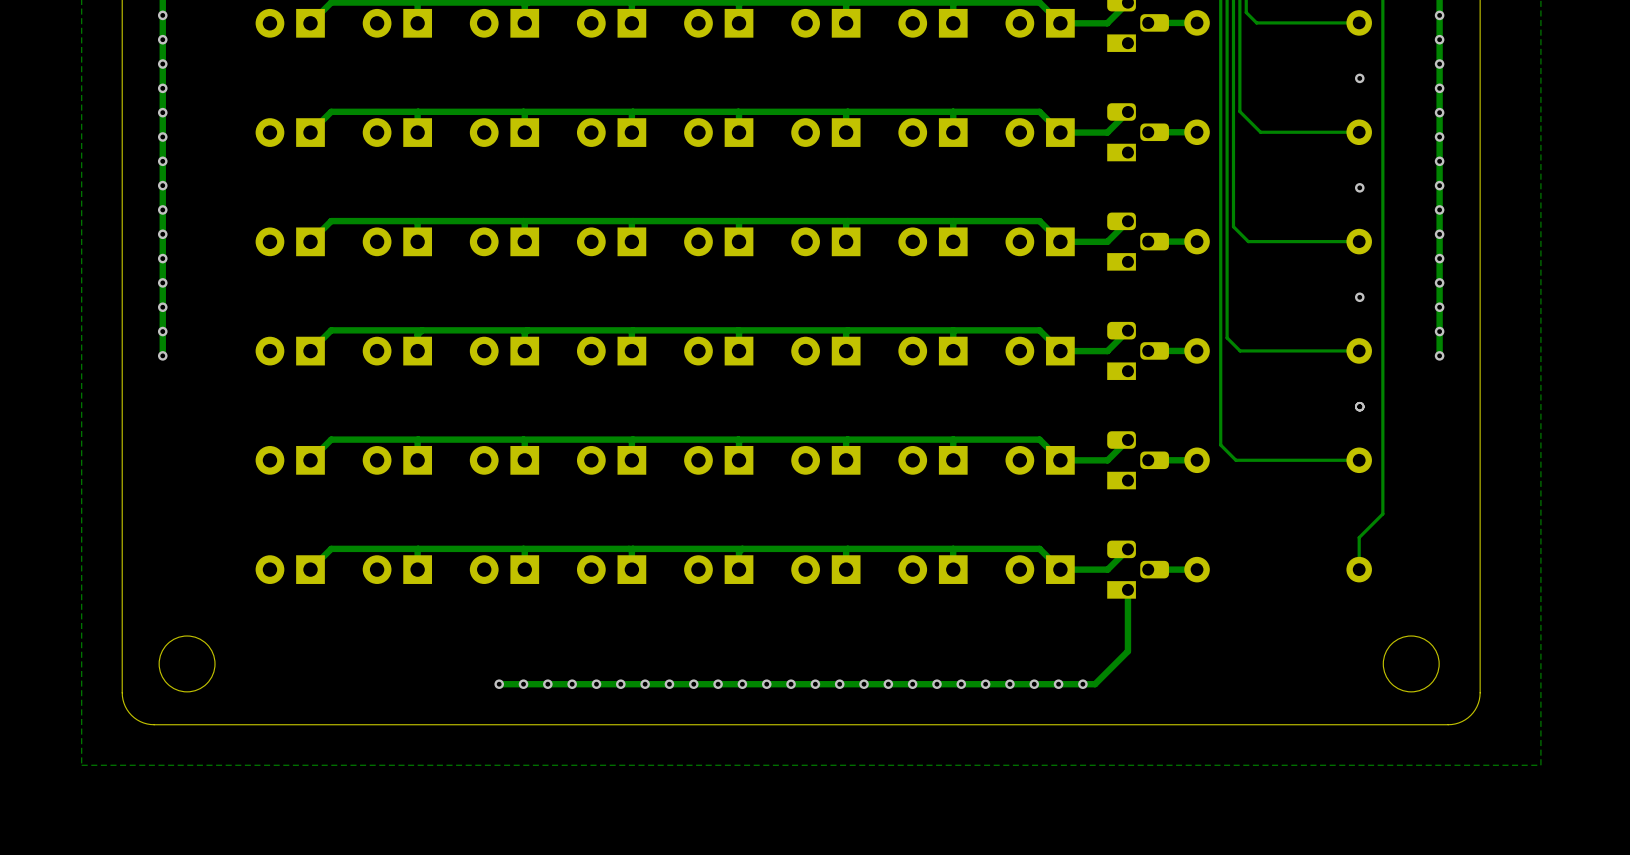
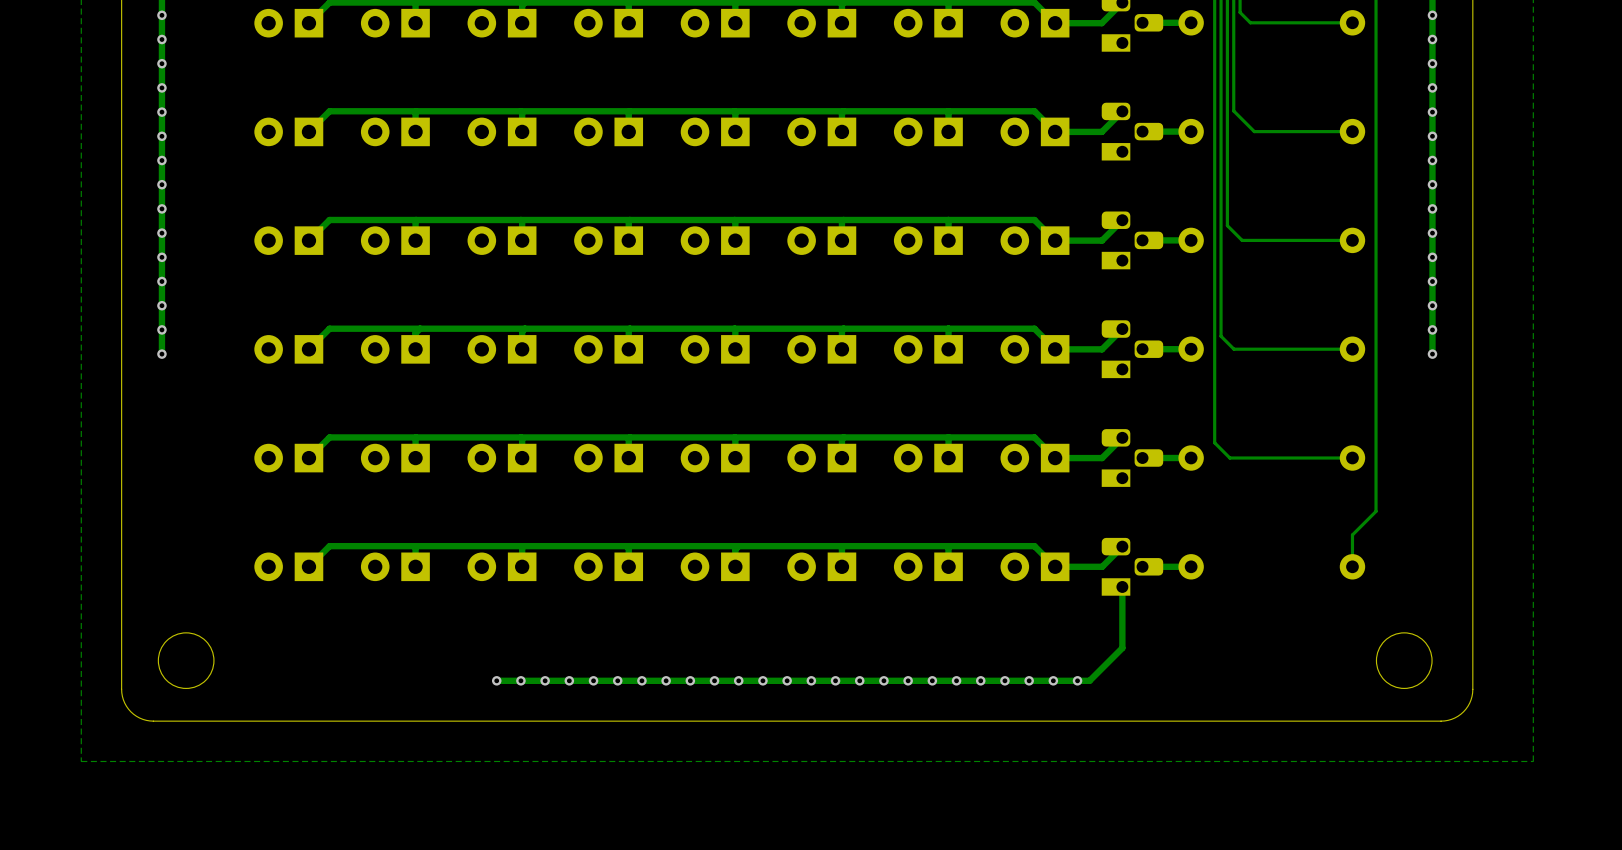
via: (1359, 78) -> none
via: (1359, 187) -> none
via: (1359, 297) -> none
via: (1359, 406) -> none

